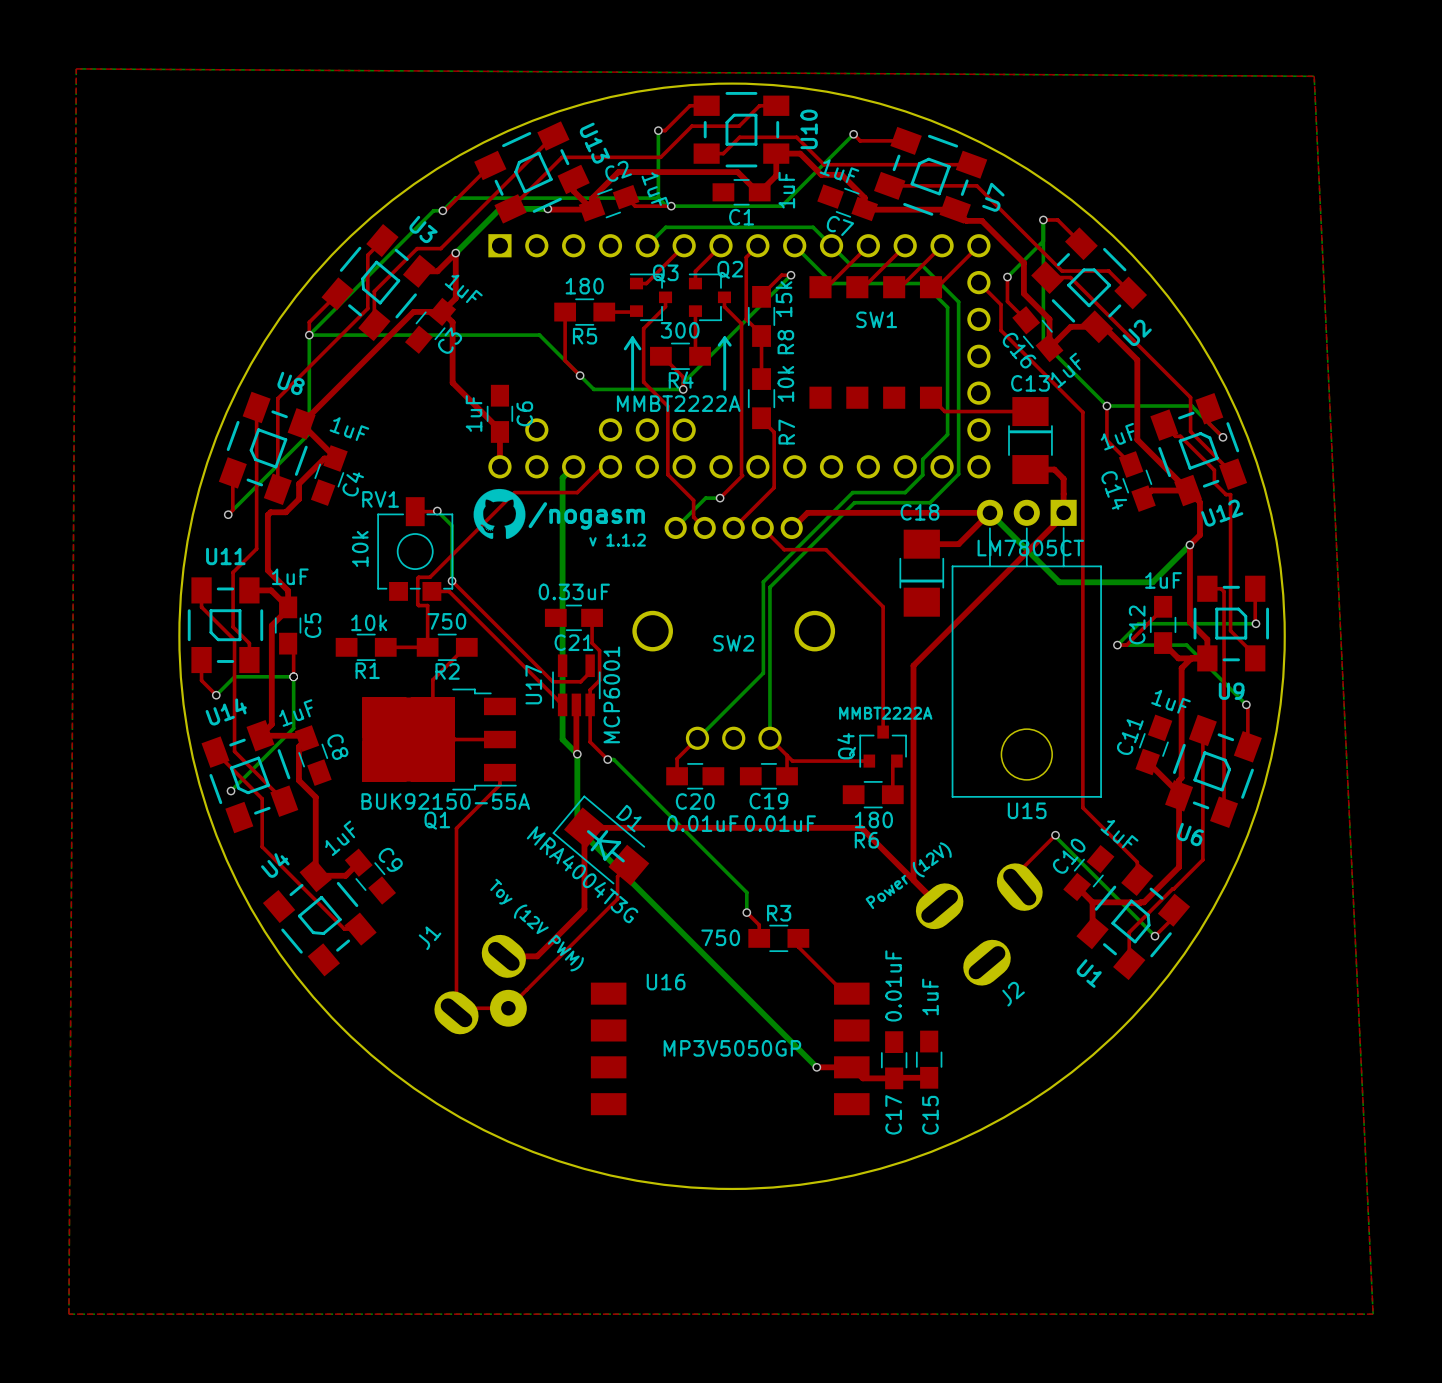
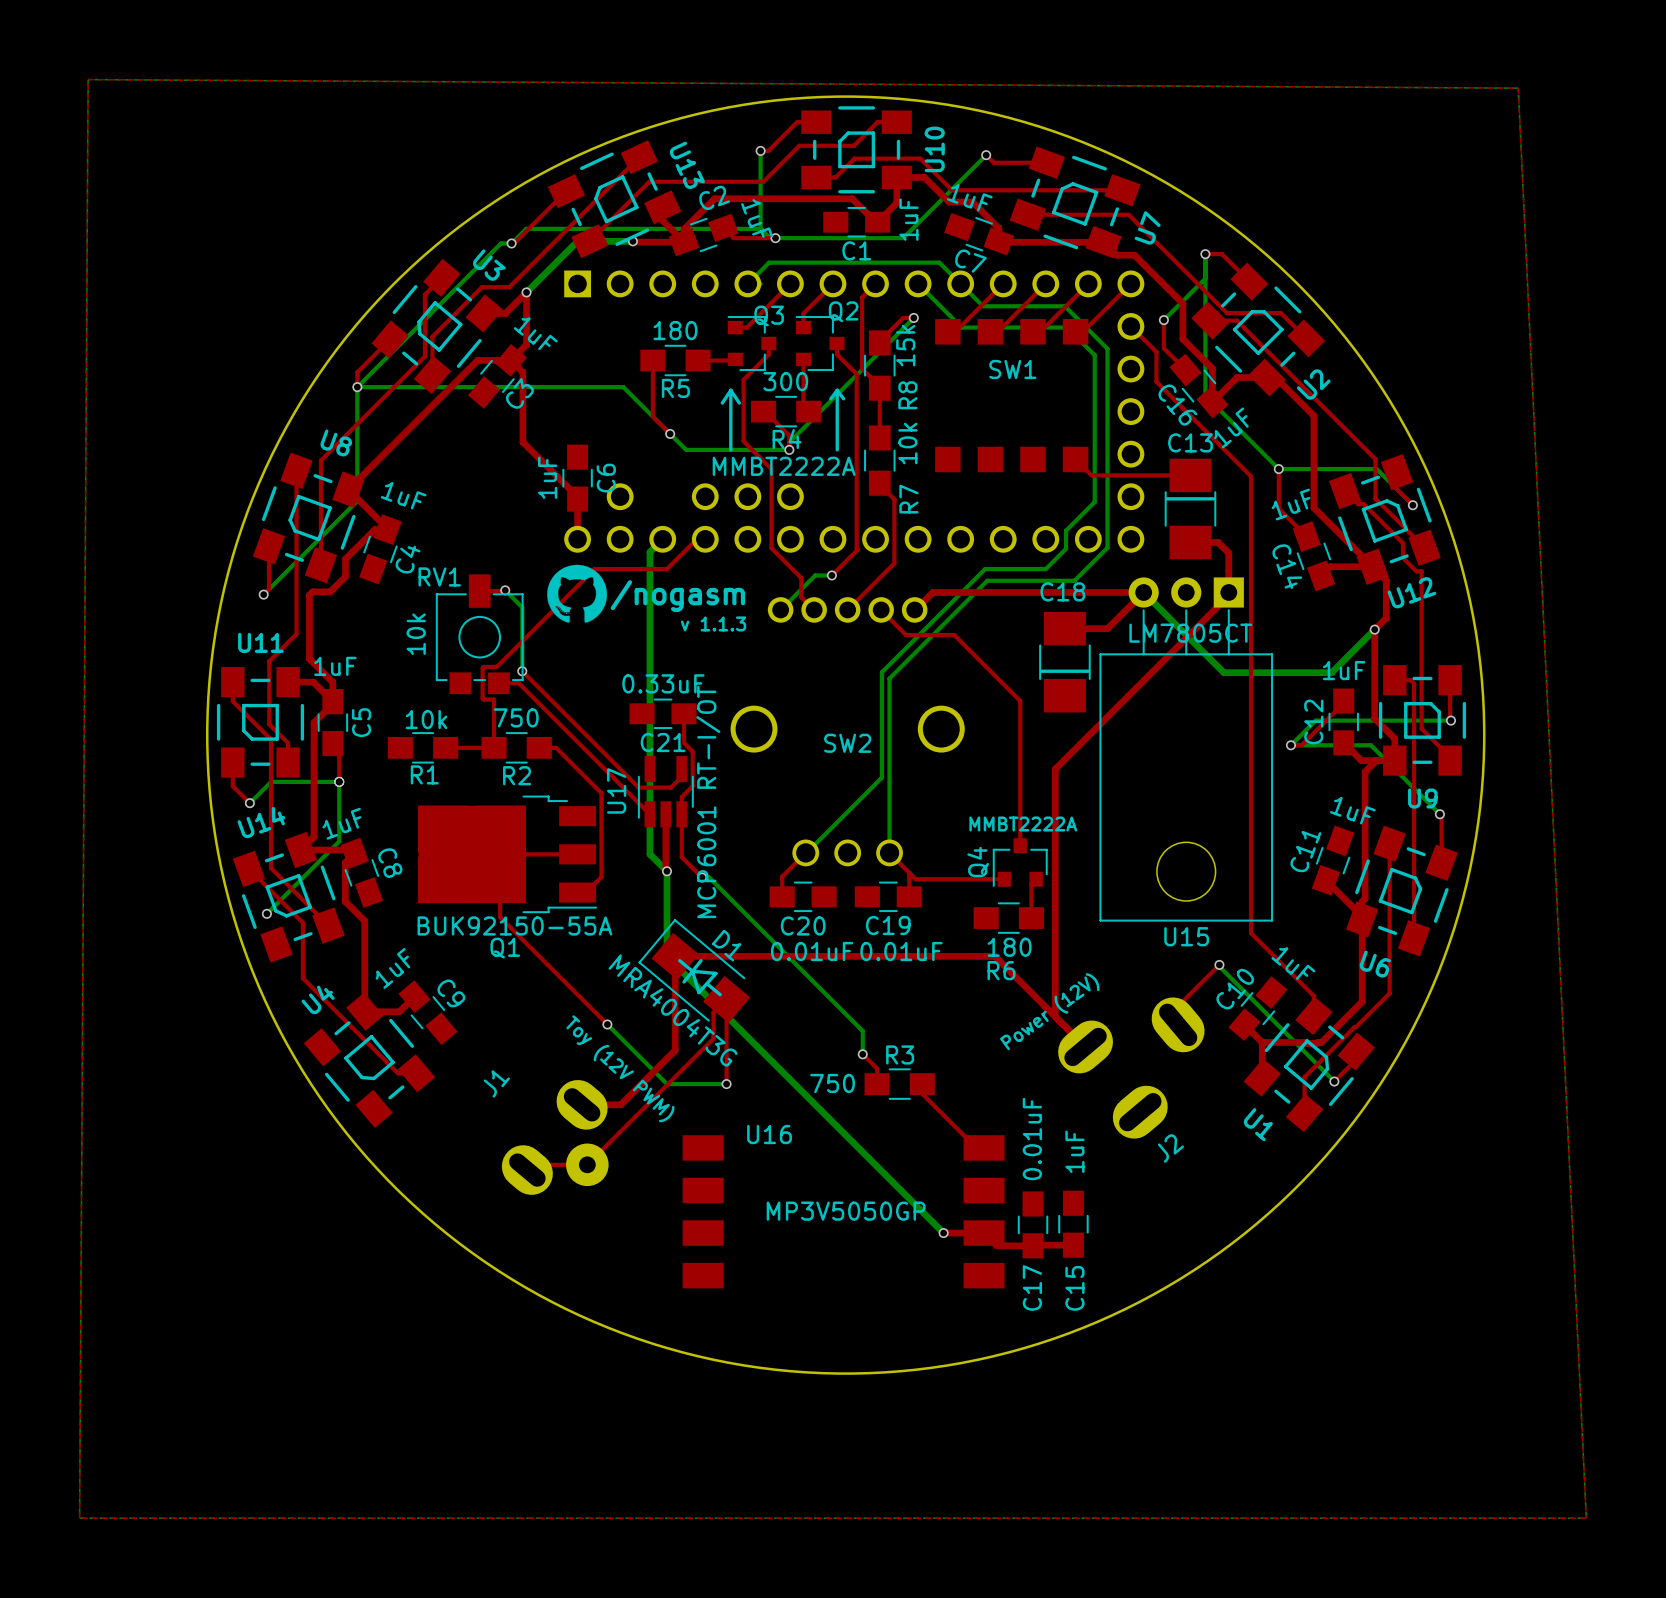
text: v 1.1.2 (617, 540) -> v 1.1.3 (713, 623)
top track: (465, 647) (432, 679) (432, 717) -> none
U17 value: MCP6001 (611, 694) -> MCP6001 RT-I/OT (708, 801)
top track: none -> (500, 879) (500, 917) (607, 1024)
top track: (499, 772) (499, 784) (456, 828) (456, 1012) -> (577, 892) (585, 892) (601, 877) (601, 793) (556, 747) (539, 747)
top track: none -> (726, 999) (726, 1084)
bottom track: none -> (607, 1024) (666, 1084) (726, 1084)
via: none -> (607, 1024)
via: none -> (726, 1084)

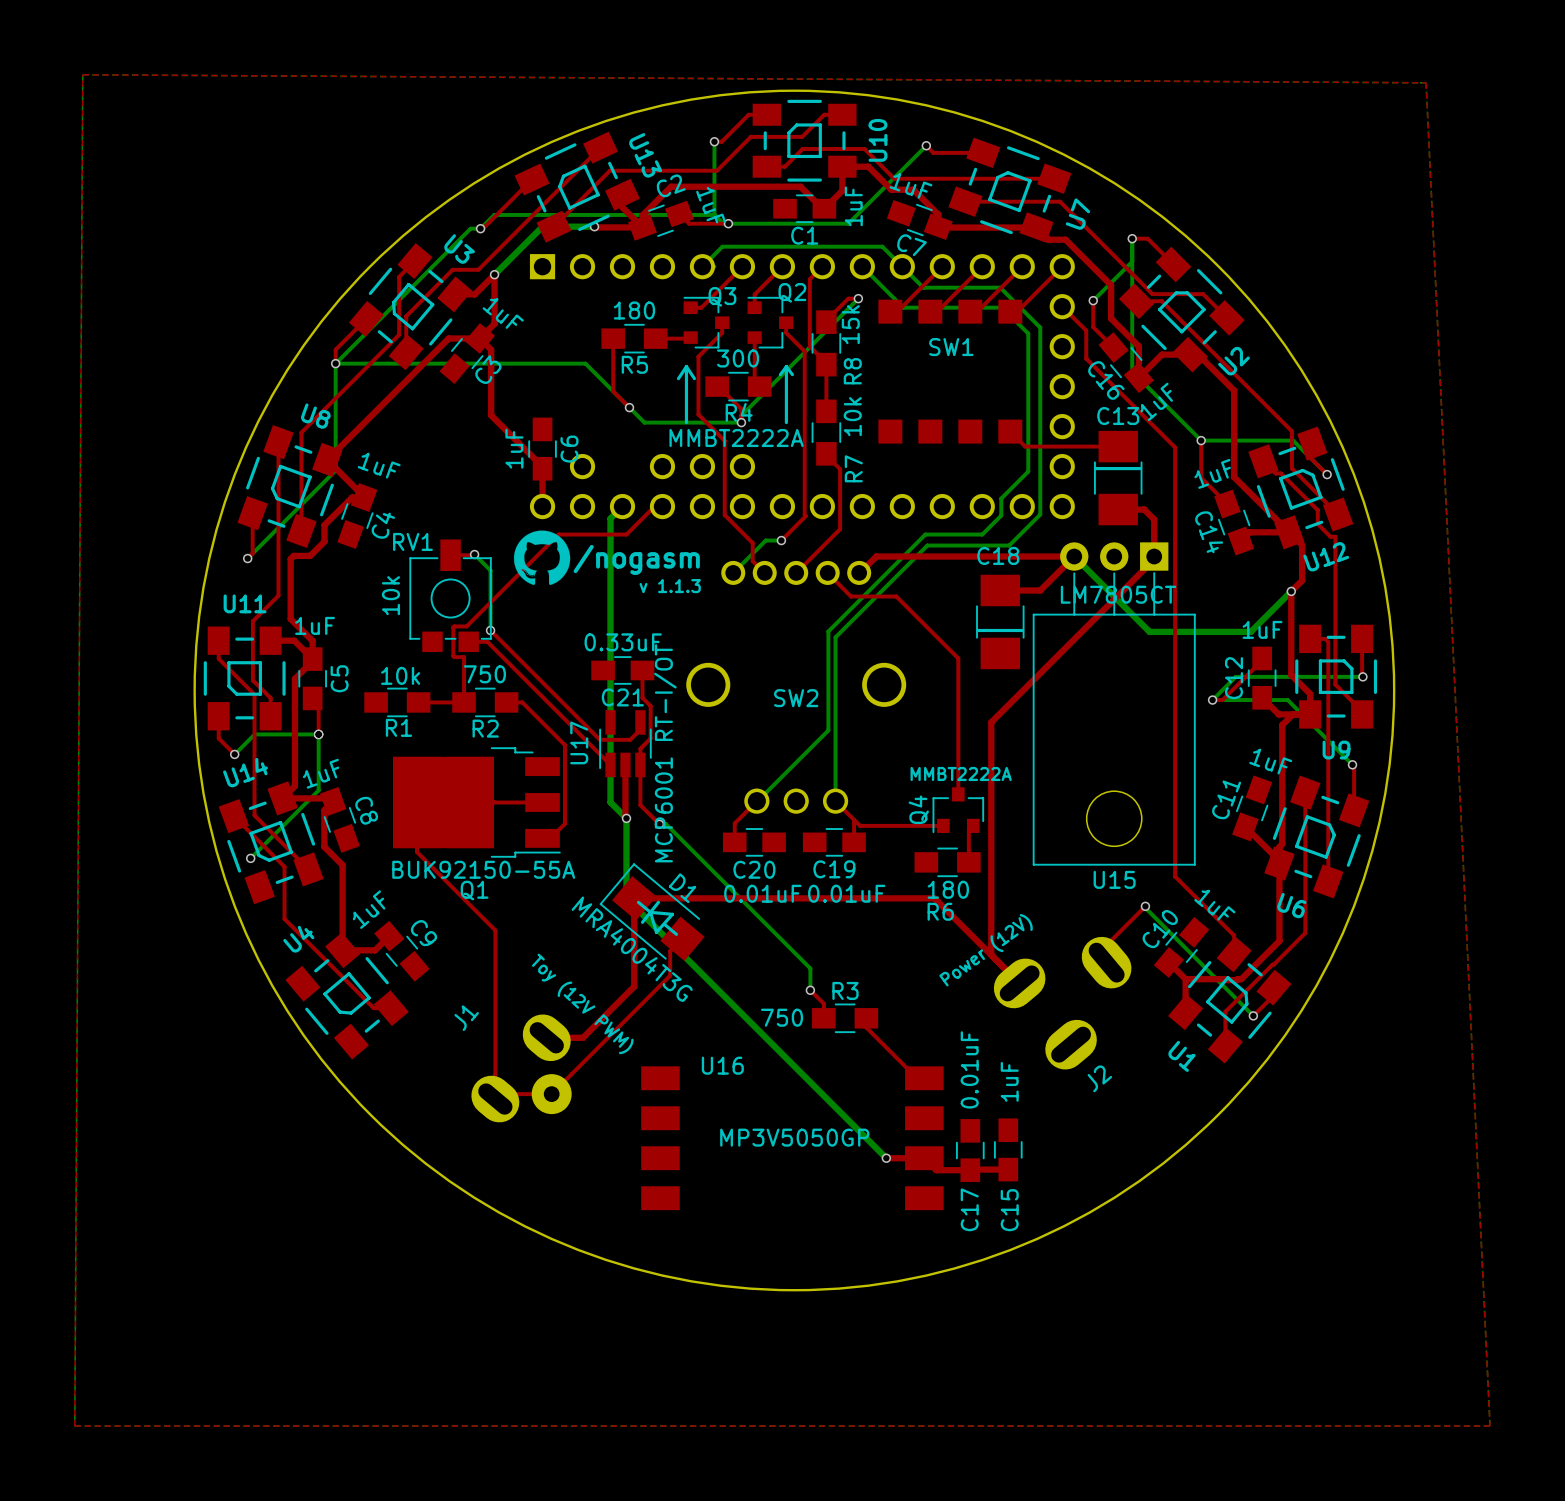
top track: none -> (417, 826) (417, 852) (495, 930) (495, 1099)
top track: (500, 879) (500, 917) (607, 1024) -> none
top track: (726, 999) (726, 1084) -> none
bottom track: (607, 1024) (666, 1084) (726, 1084) -> none
via: (607, 1024) -> none
via: (726, 1084) -> none

